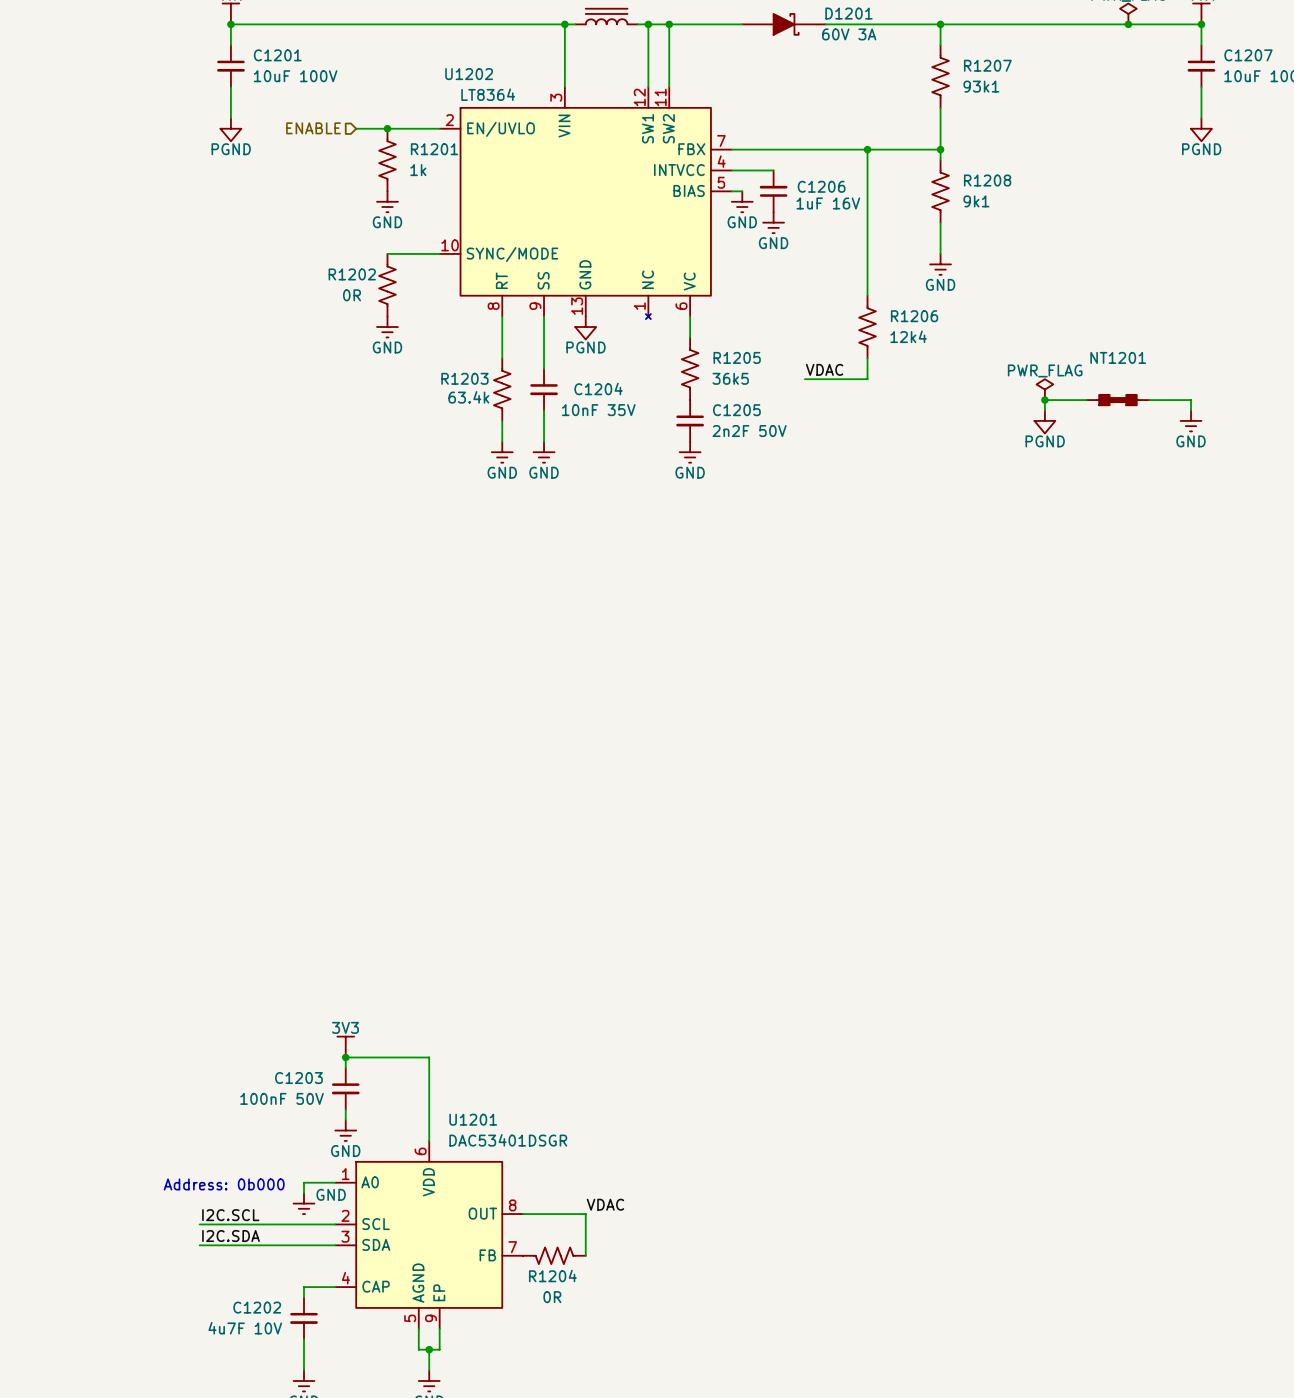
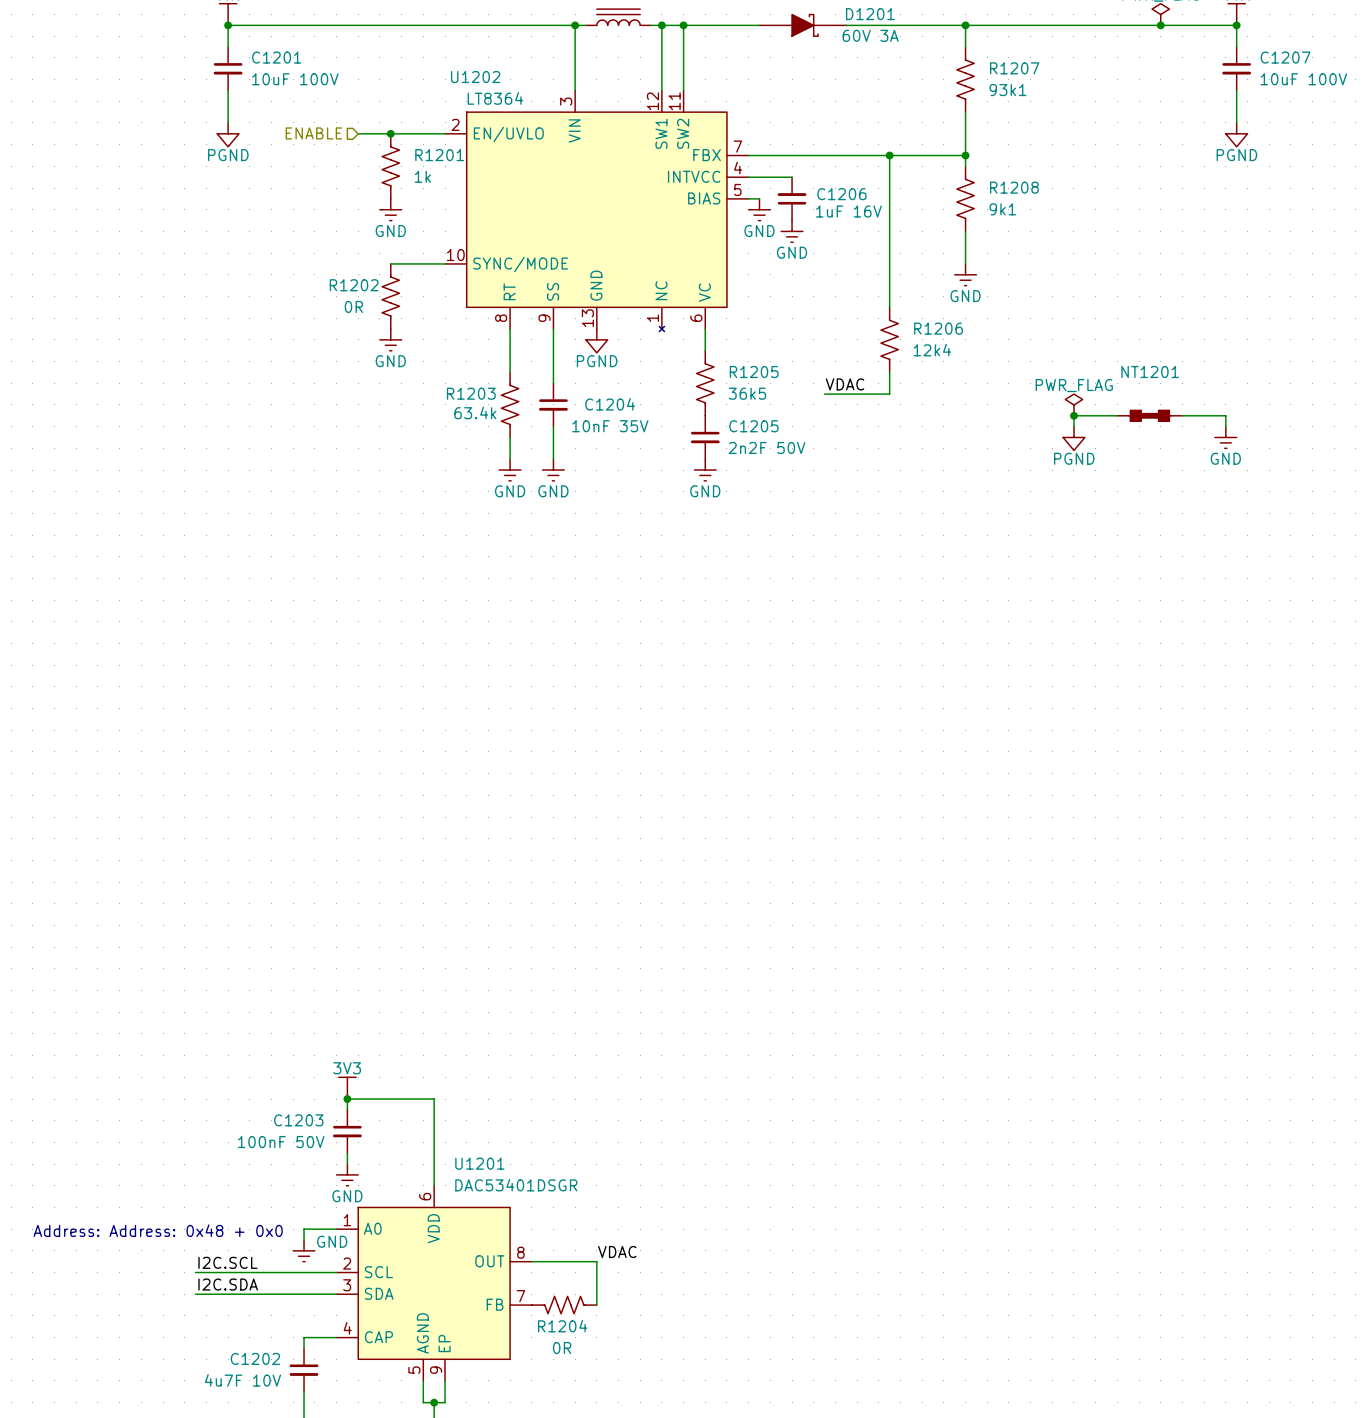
text: none -> Address: Address: 0x48 + 0x0 (158, 1230)
text: Address: 0b000 (224, 1184) -> none

